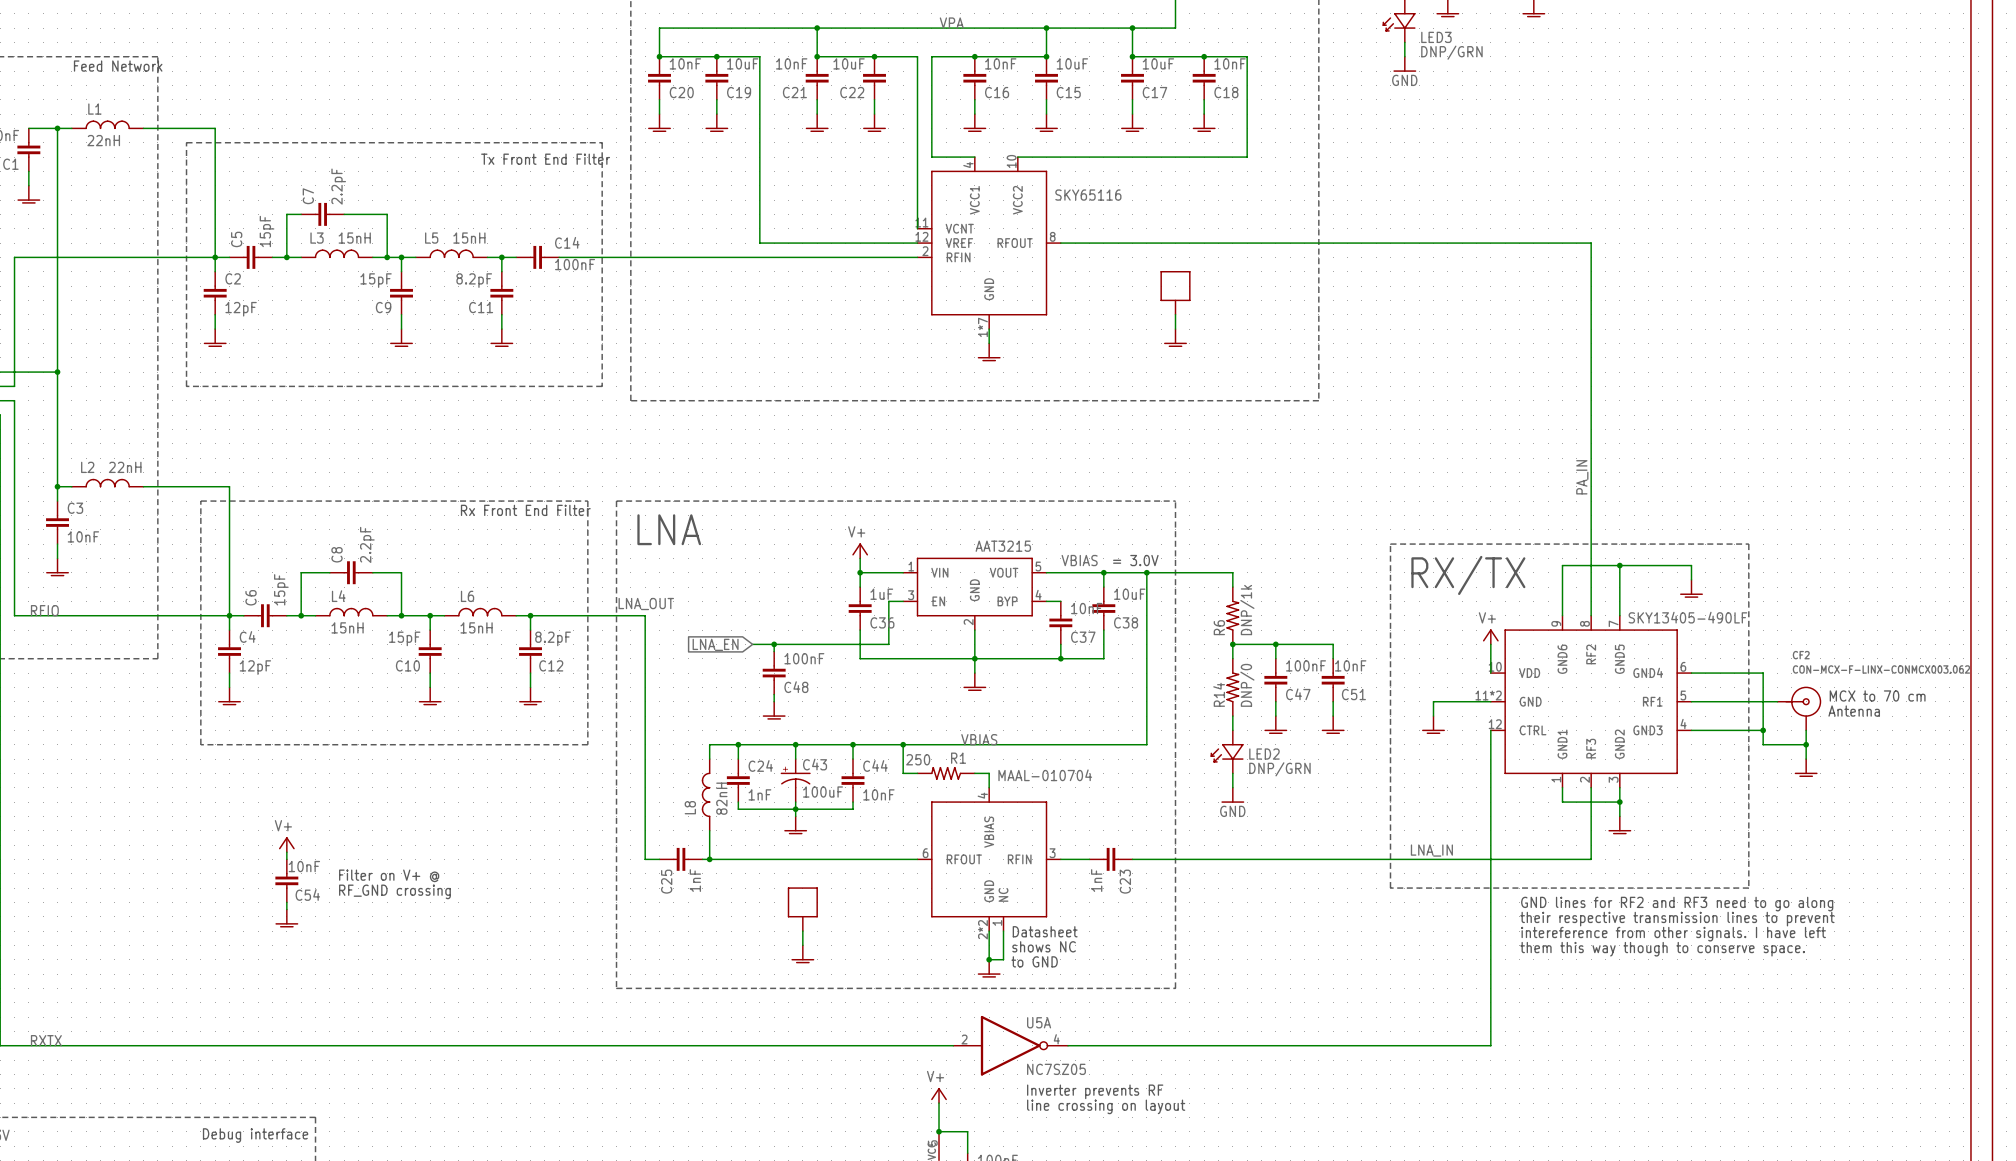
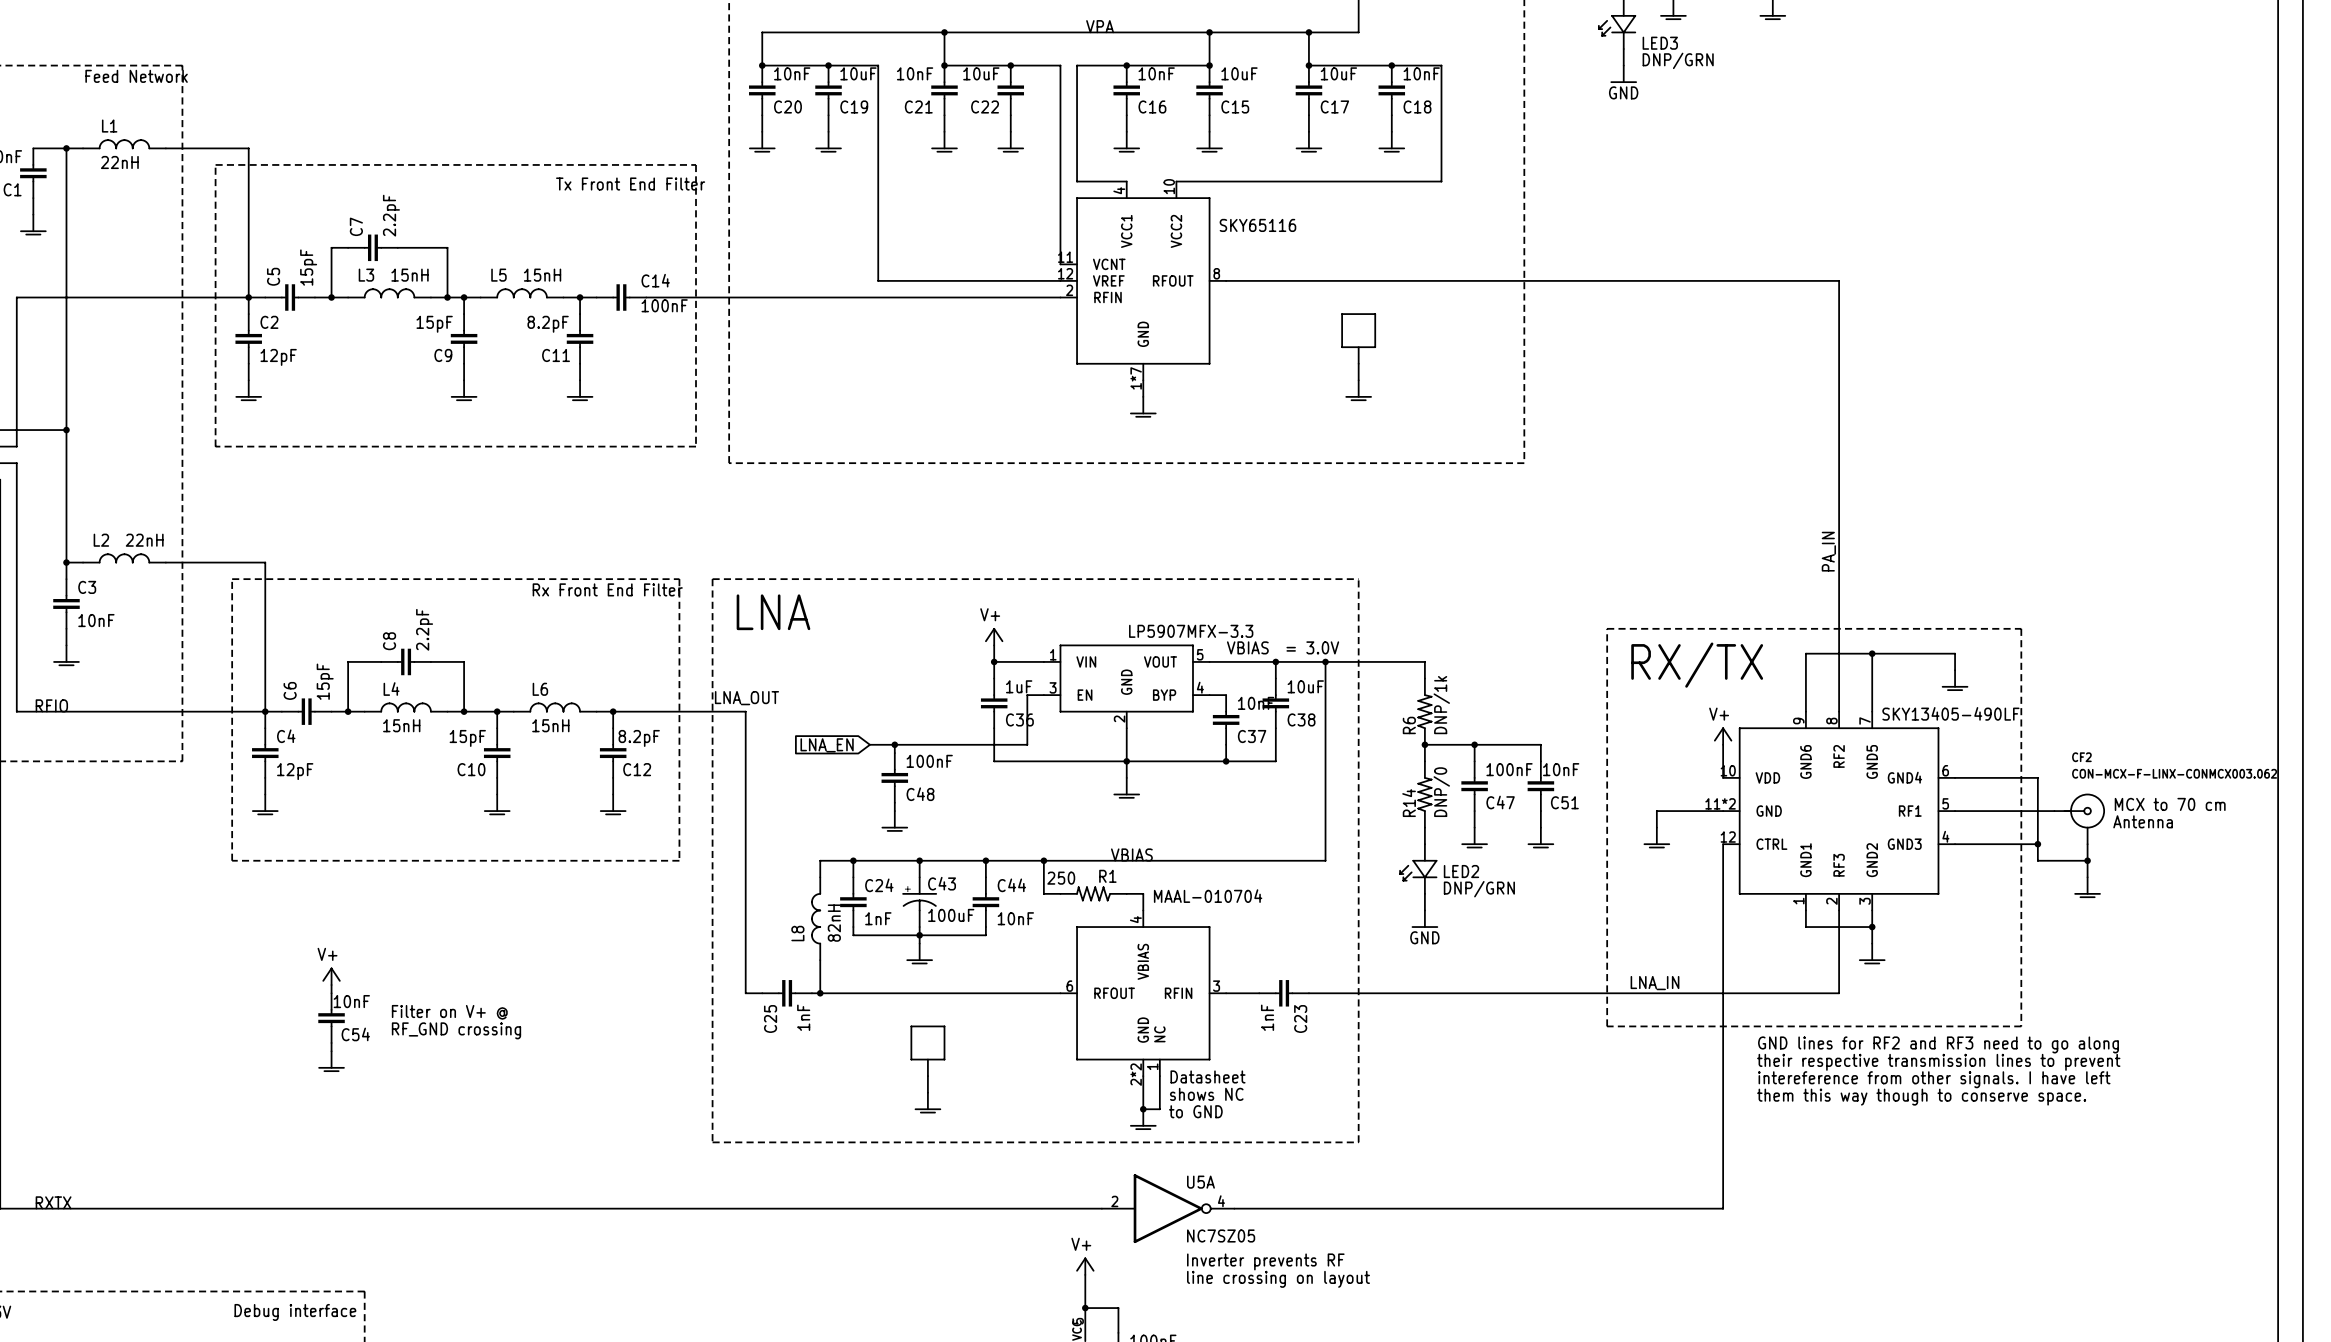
part value: AAT3215 (1003, 546) -> LP5907MFX-3.3 (1191, 631)

